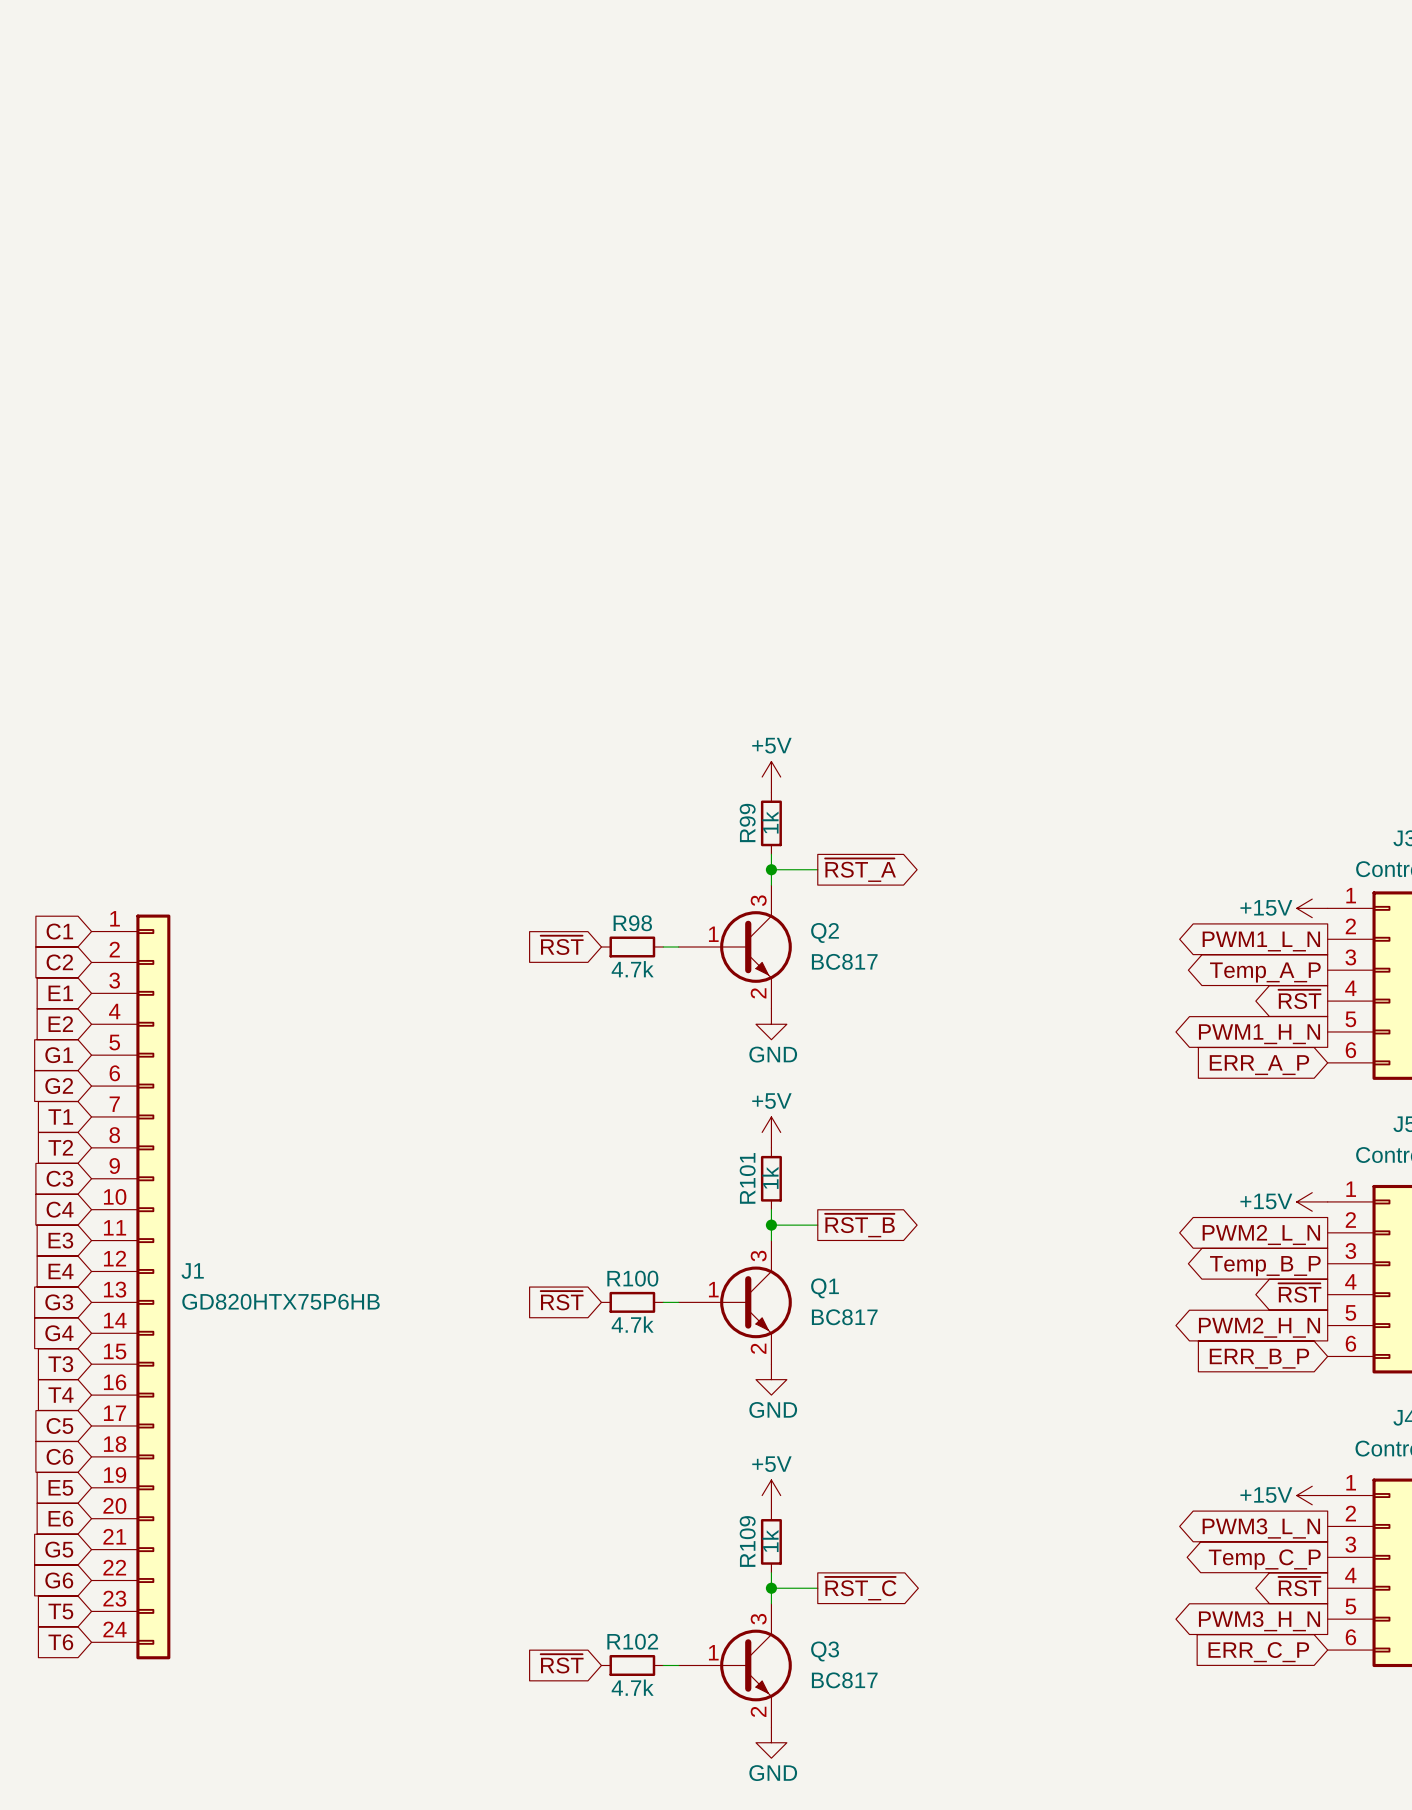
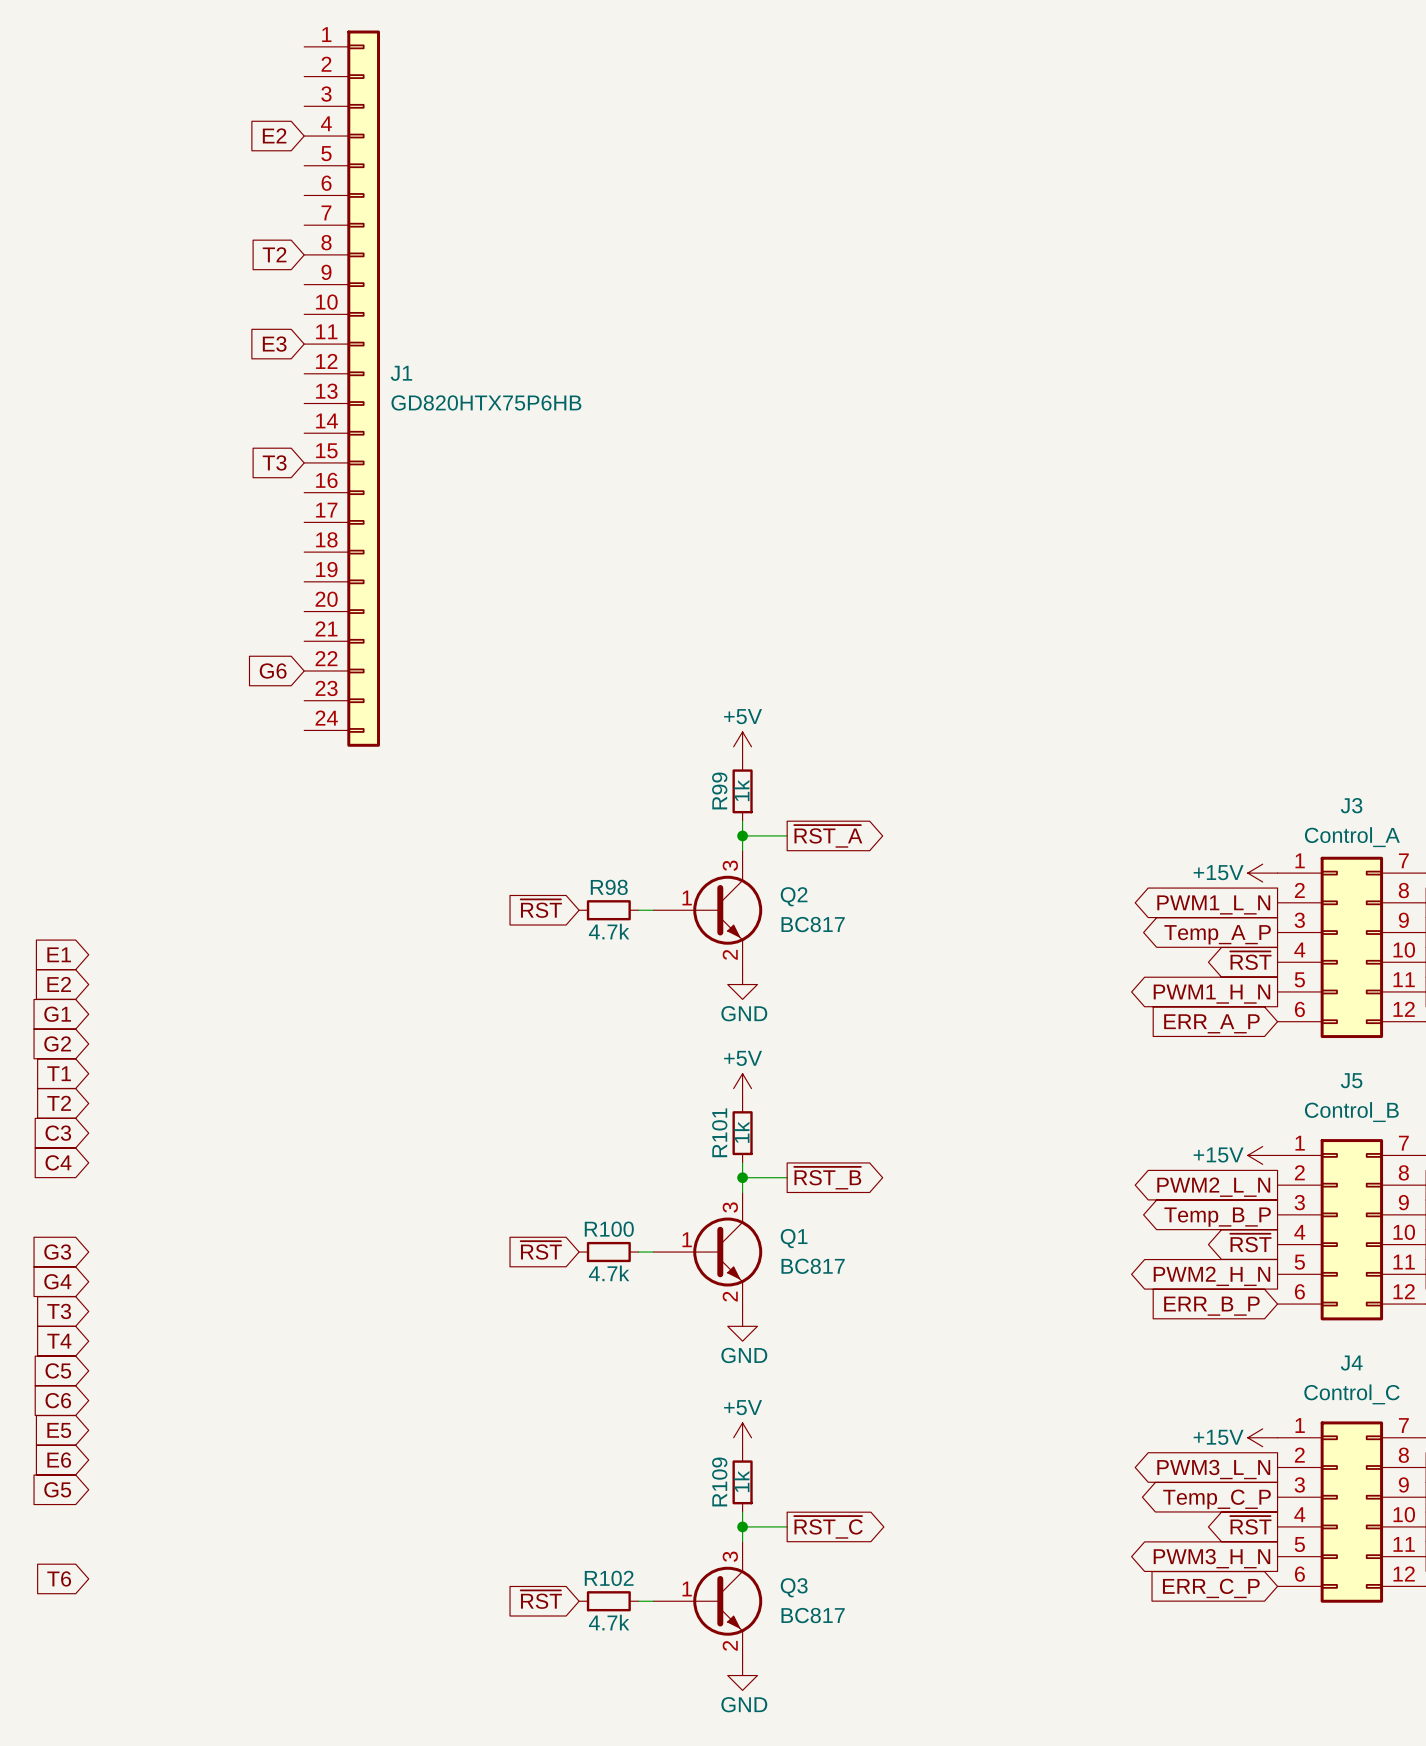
global label: none -> E2 (274, 135)
global label: none -> T2 (274, 254)
global label: none -> E3 (274, 344)
global label: none -> T3 (274, 462)
global label: none -> G6 (273, 670)
global label: C1 (59, 931) -> none
global label: C2 (59, 962) -> none
global label: E3 (60, 1240) -> none
global label: E4 (61, 1271) -> none
J1 position: (130, 1286) -> (342, 388)
global label: G6 (59, 1580) -> none
global label: T5 (60, 1611) -> none

